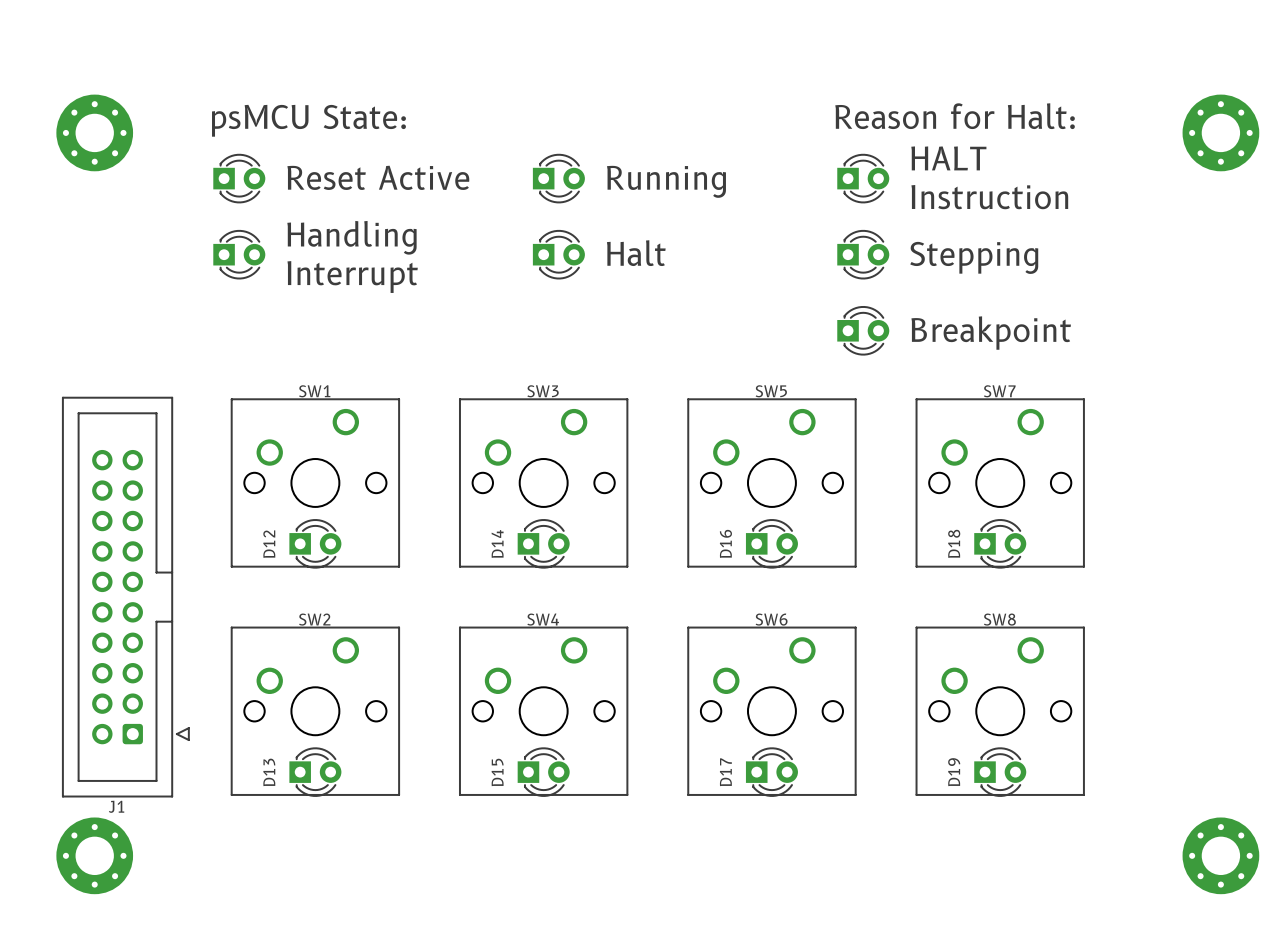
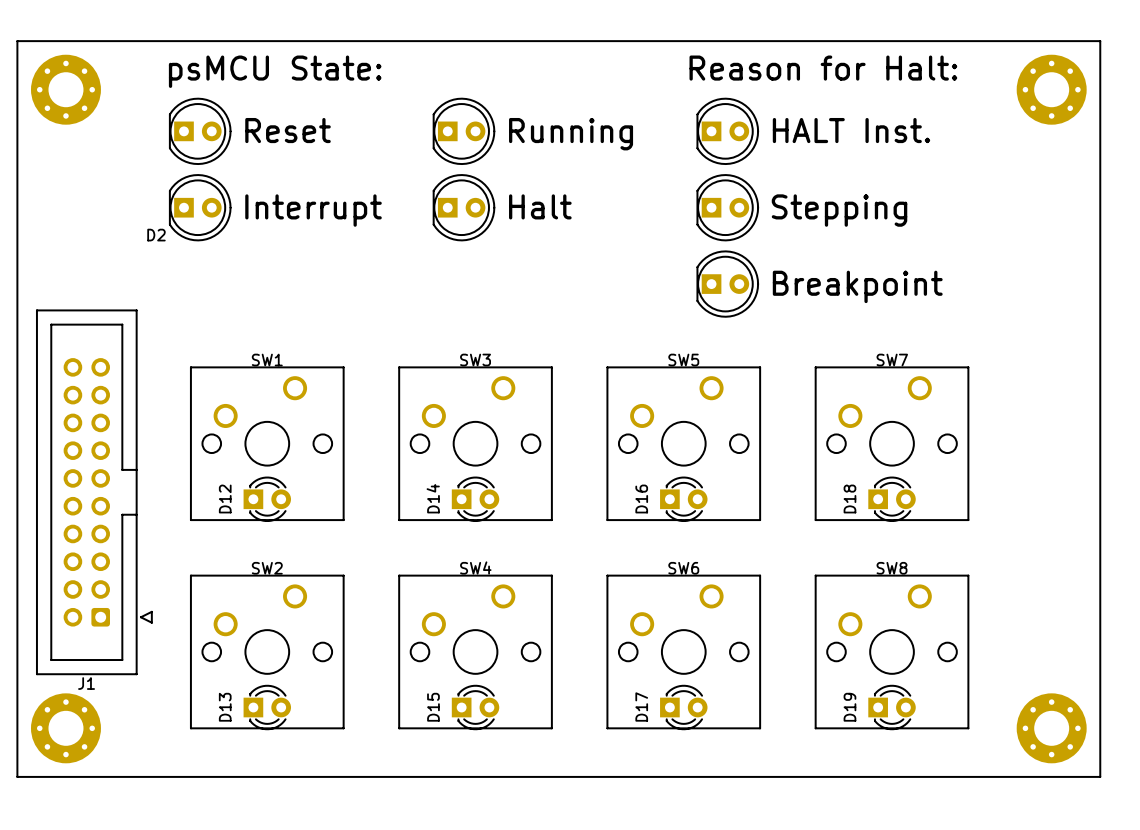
board edge: none -> (17, 41) (17, 776) (1100, 776) (1100, 41) (17, 41)
text position: Reason for Halt: (955, 116) -> Reason for Halt: (823, 68)
text position: psMCU State: (308, 120) -> psMCU State: (275, 71)
part position: (94, 132) -> (65, 89)
part position: (1220, 132) -> (1051, 89)
text: none -> Reset (288, 130)
text: none -> HALT Inst. (851, 130)
part: none -> (200, 131)
part: none -> (464, 131)
part: none -> (727, 131)
text: HALT (948, 158) -> none
text: Reset Active (378, 177) -> none
part: (239, 178) -> none
part: (558, 178) -> none
part: (863, 178) -> none
text position: Running (666, 181) -> Running (571, 134)
text: Instruction (989, 197) -> none
D2: none -> (200, 207)
part: none -> (464, 207)
part: none -> (727, 207)
text: Handling (351, 237) -> none
text position: Halt (636, 253) -> Halt (540, 206)
part: (239, 254) -> none
part: (558, 254) -> none
part: (863, 254) -> none
text position: Stepping (974, 257) -> Stepping (839, 210)
text position: Interrupt (352, 277) -> Interrupt (313, 210)
part: none -> (727, 284)
part: (863, 330) -> none
text position: Breakpoint (991, 333) -> Breakpoint (857, 286)
J1 position: (125, 597) -> (94, 492)
part position: (94, 855) -> (65, 728)
part position: (1220, 855) -> (1051, 728)

